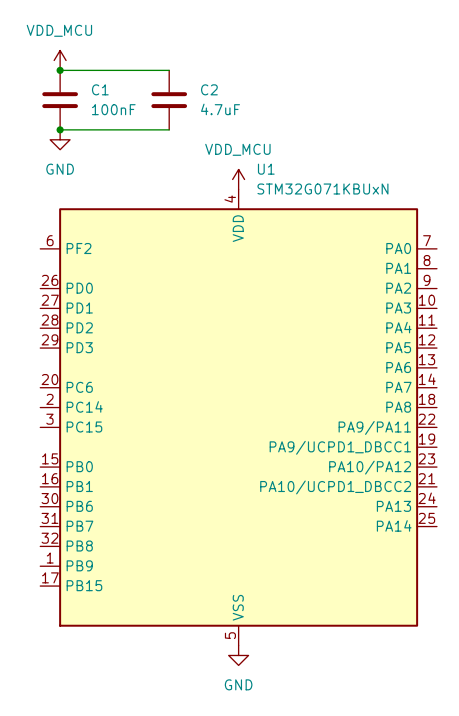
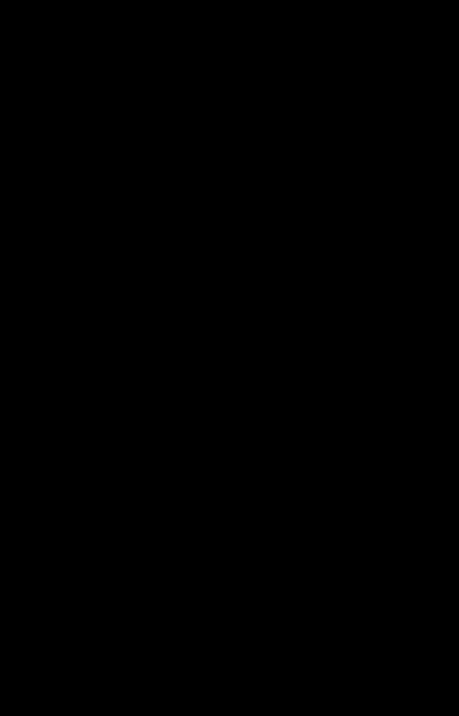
power symbol: VDD_MCU (60, 60) -> none
wire: (60, 70) (169, 70) -> none
junction: (60, 70) -> none
C1: 100nF (60, 100) -> none
C2: 4.7uF (169, 100) -> none
wire: (60, 129) (169, 129) -> none
junction: (60, 129) -> none
power symbol: GND (60, 139) -> none
power symbol: VDD_MCU (238, 179) -> none
U1: STM32G071KBUxN (238, 417) -> none
power symbol: GND (238, 655) -> none

